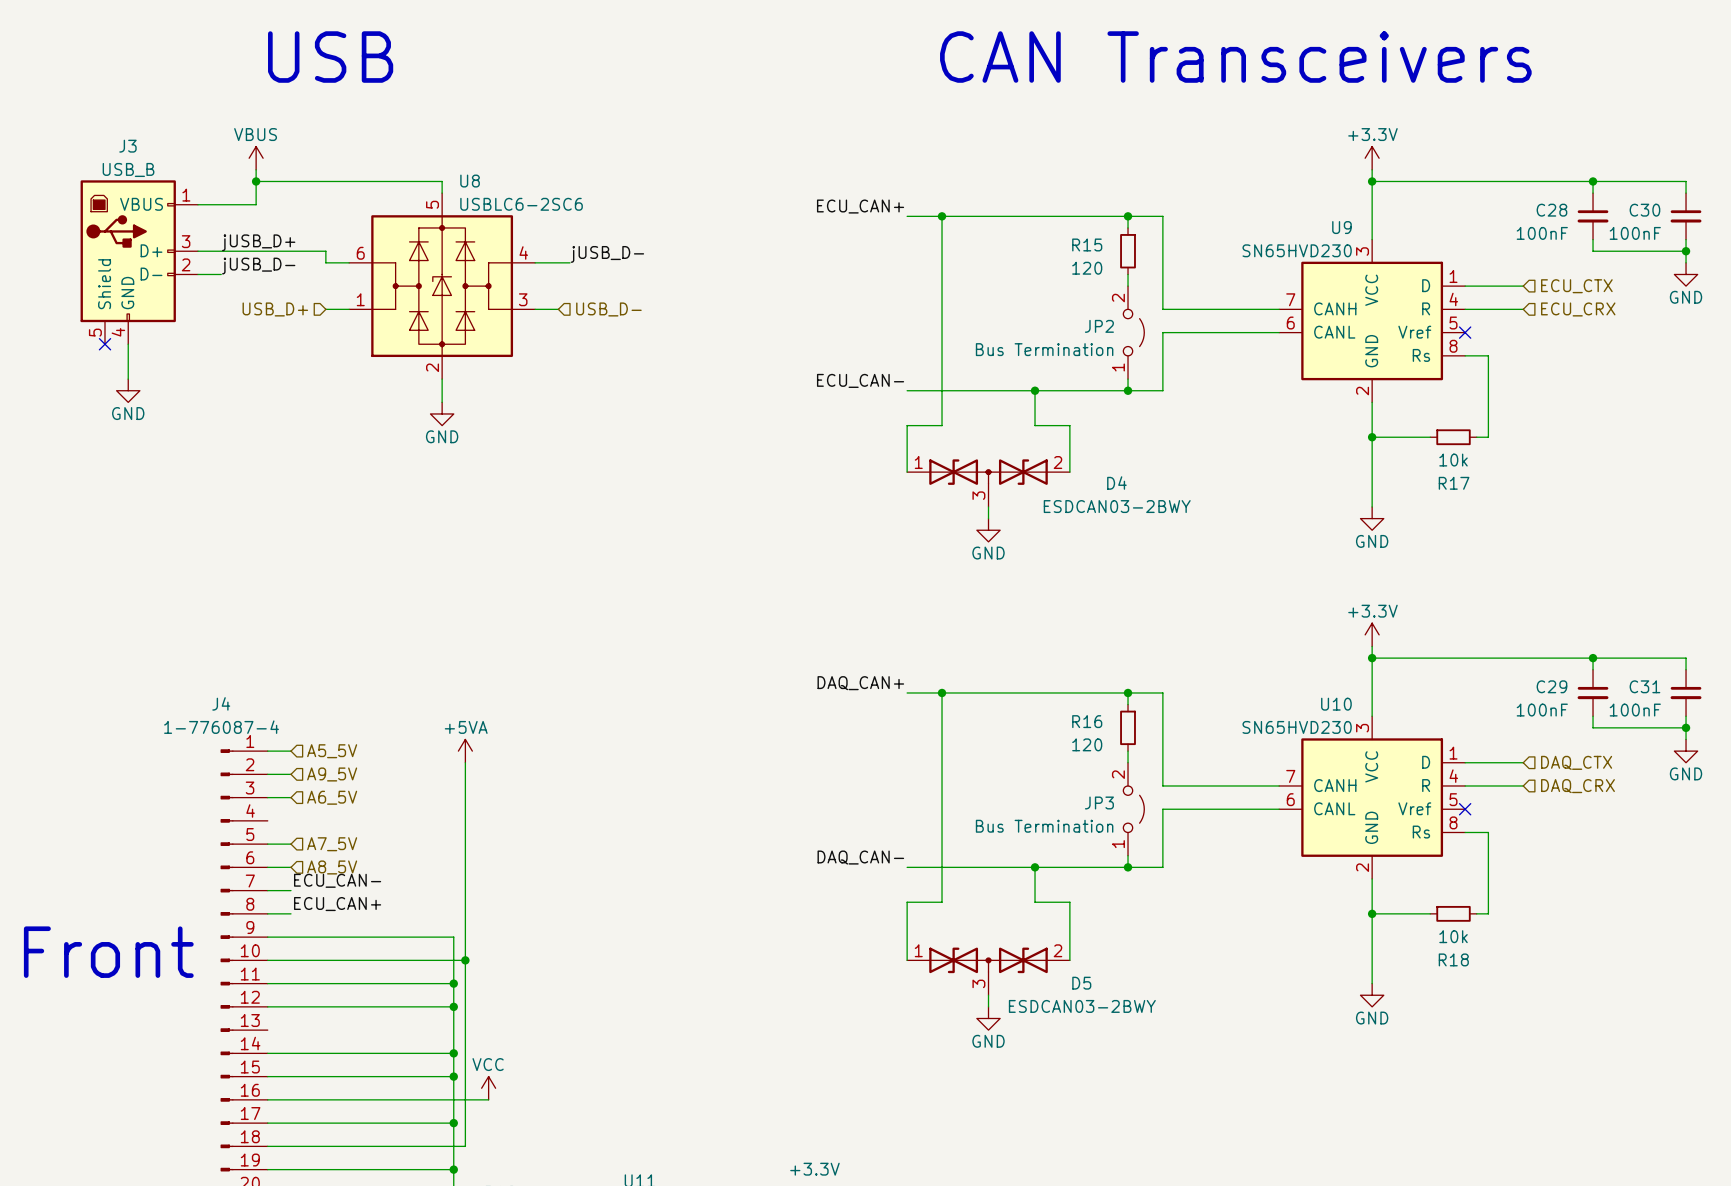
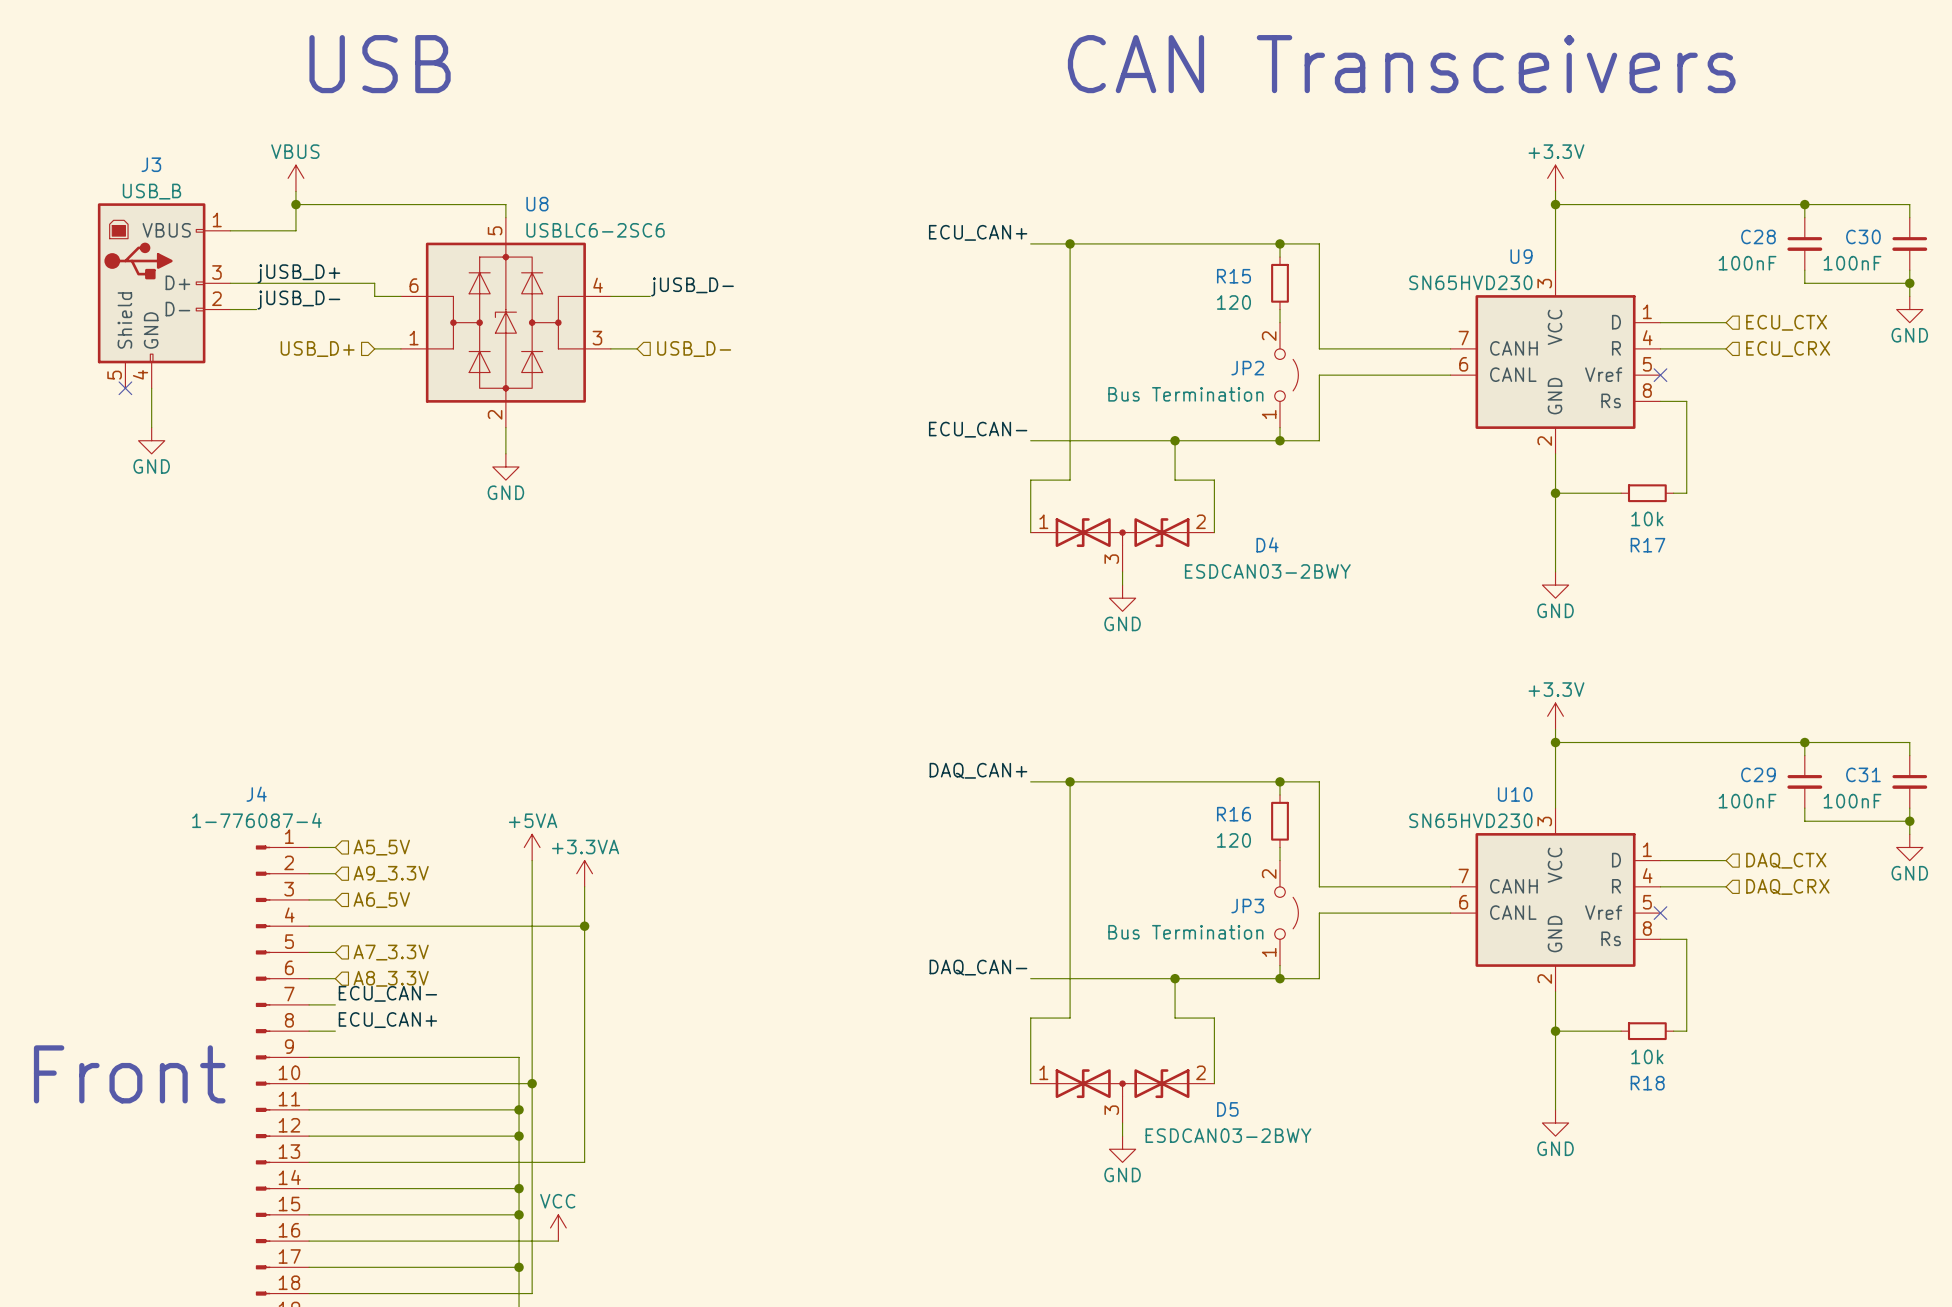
hierarchical label: A9_5V (332, 774) -> A9_3.3V (391, 873)
power symbol: none -> +3.3VA (584, 873)
wire: none -> (584, 886) (584, 1162) (309, 1162)
wire: none -> (309, 926) (584, 926)
junction: none -> (584, 926)
hierarchical label: A7_5V (332, 844) -> A7_3.3V (391, 952)
hierarchical label: A8_5V (332, 867) -> A8_3.3V (391, 978)

